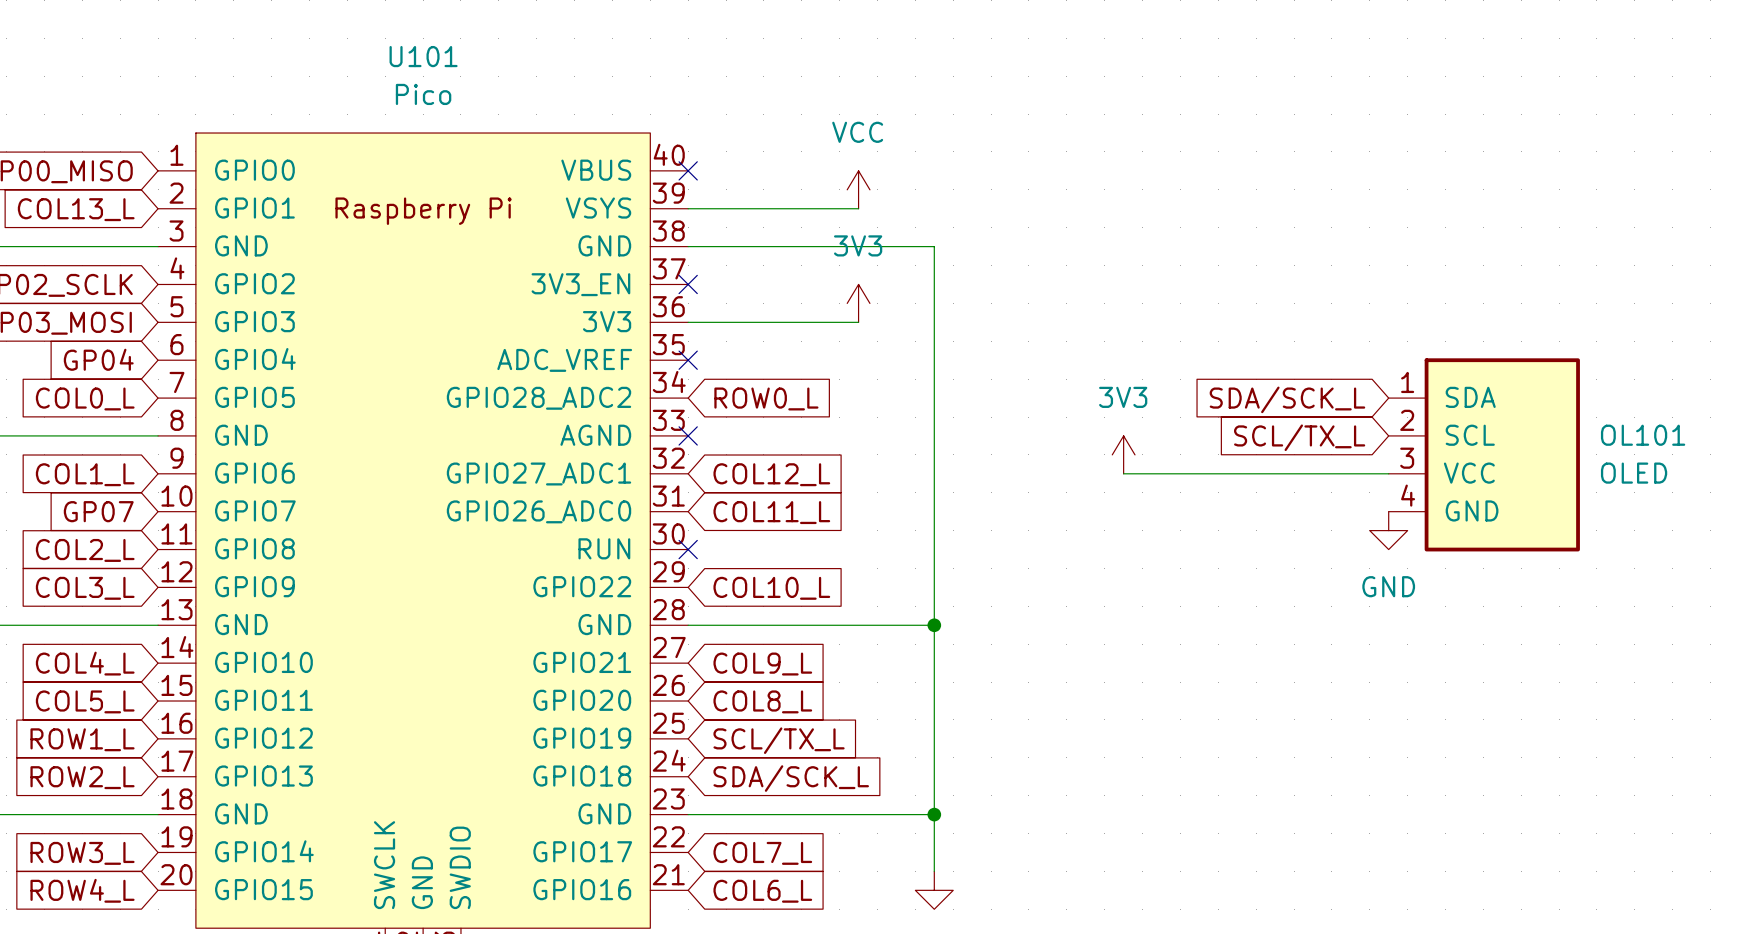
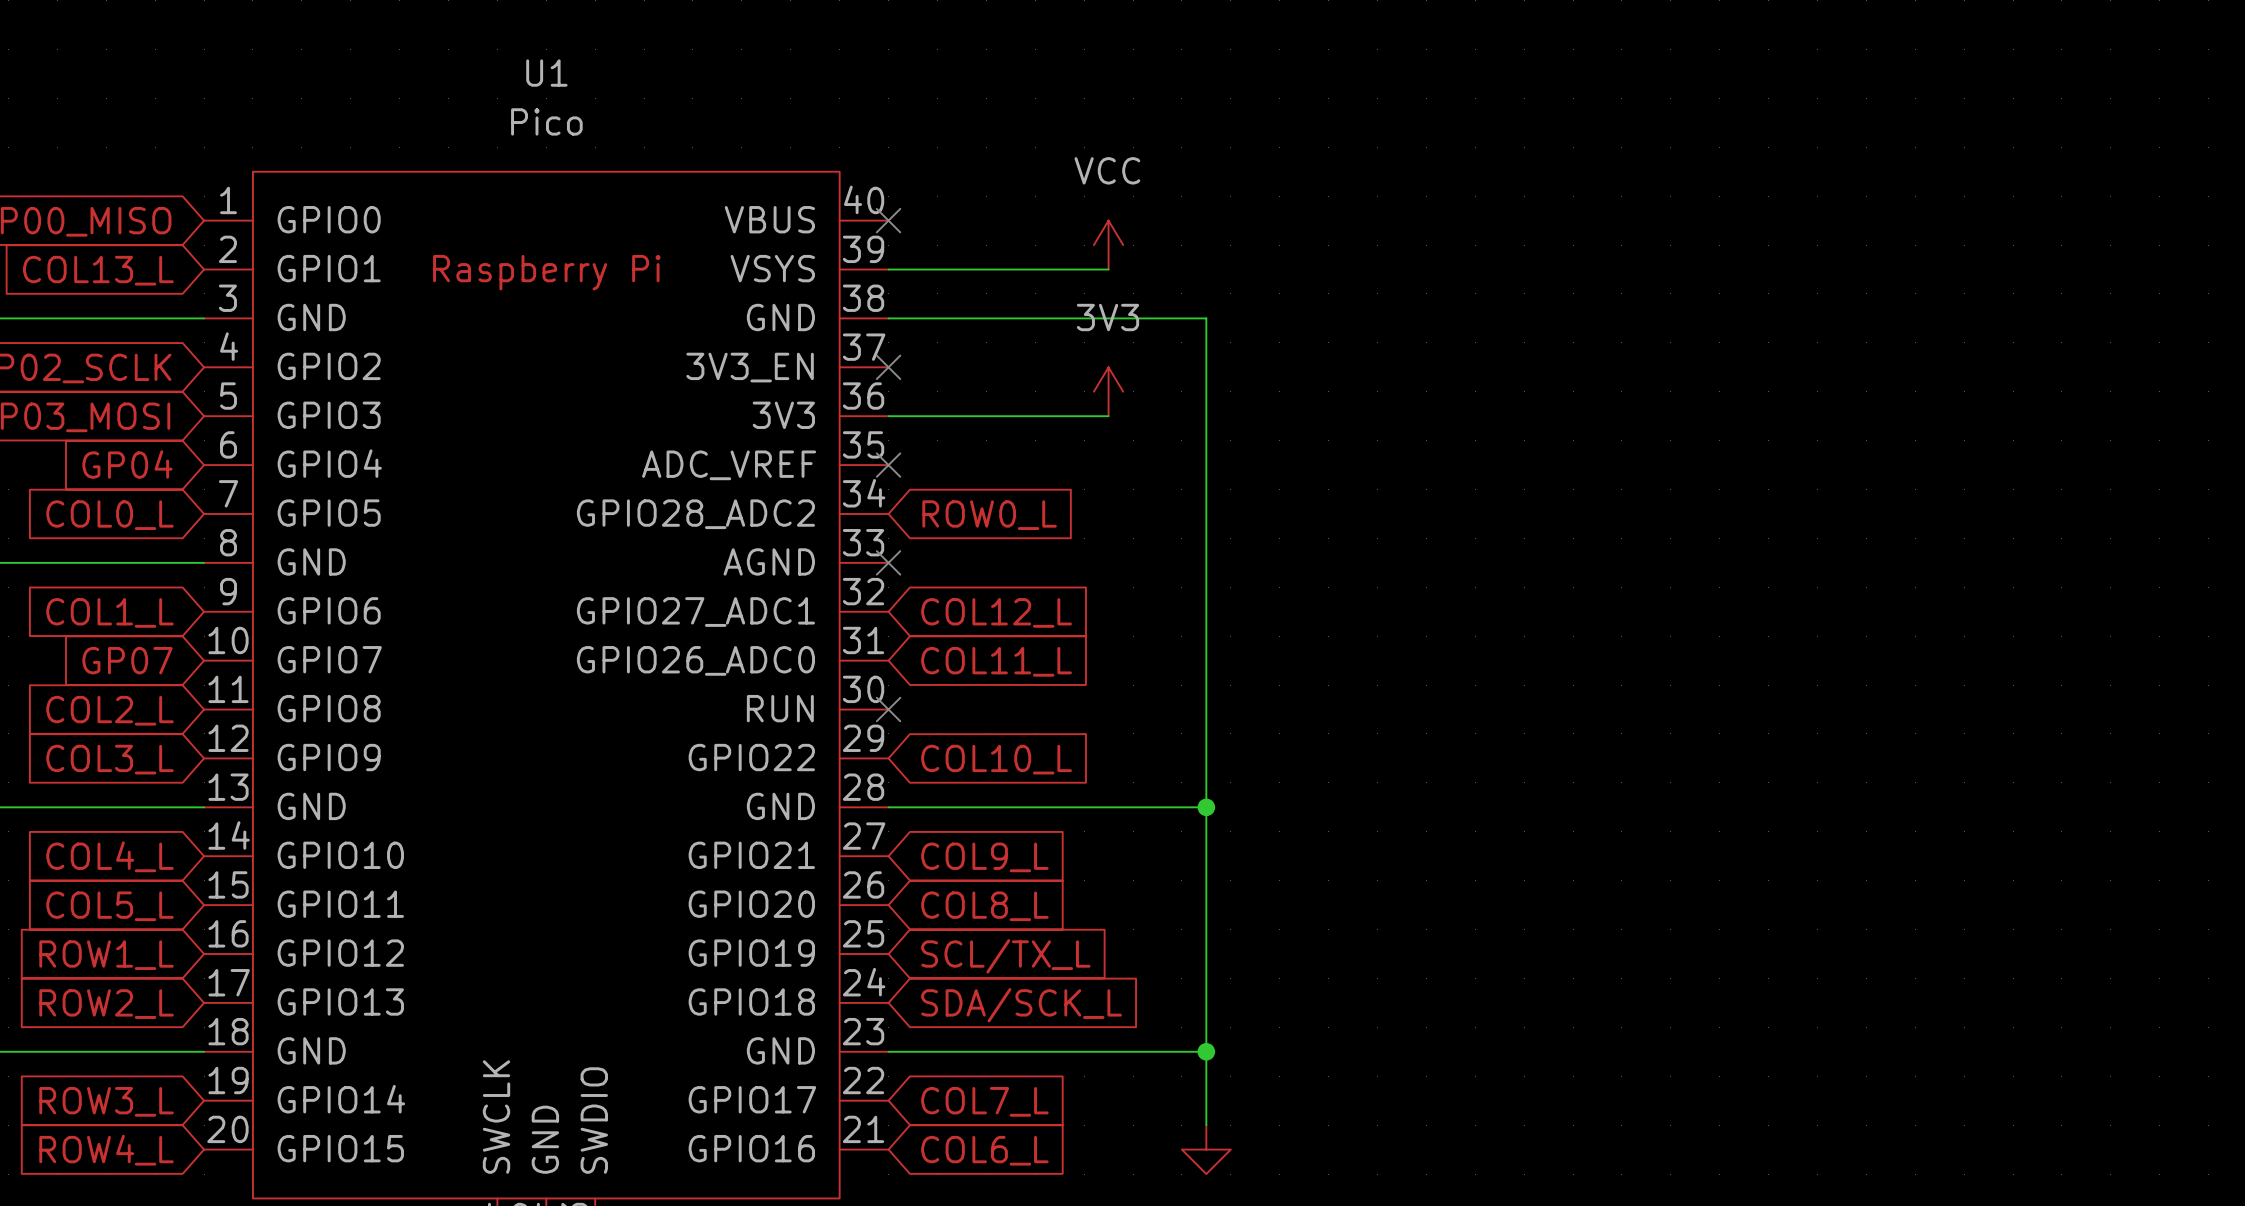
U101 name: U101 (423, 56) -> U1 (546, 73)
global label: SDA/SCK_L (1287, 399) -> none
global label: SCL/TX_L (1299, 437) -> none
power symbol: 3V3 (1123, 454) -> none
OL101: OLED (1484, 454) -> none
wire: (1123, 473) (1388, 473) -> none
power symbol: GND (1388, 530) -> none

